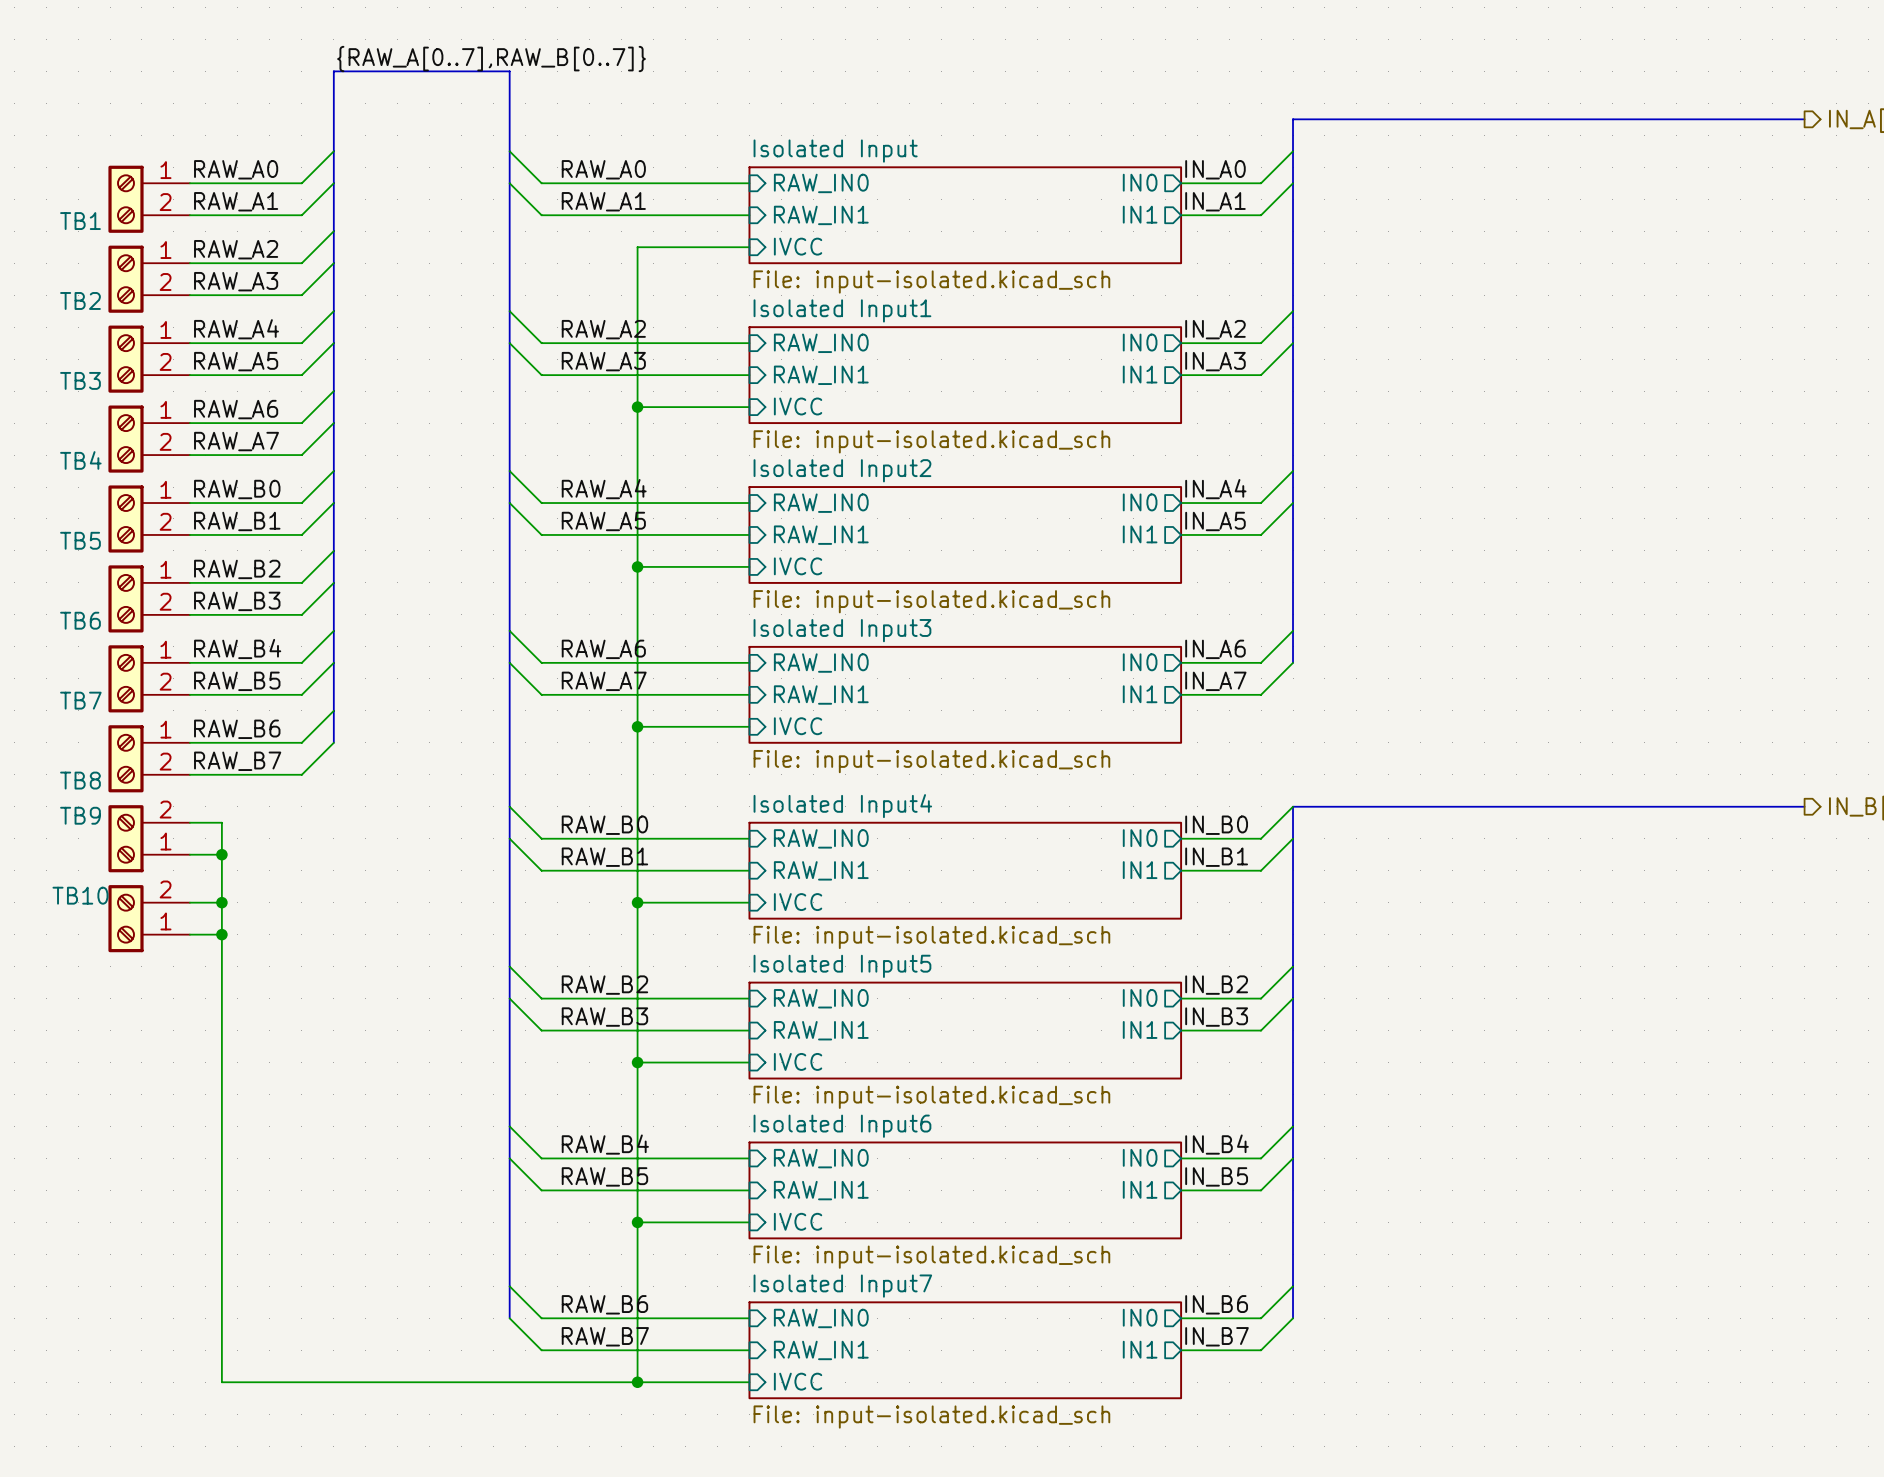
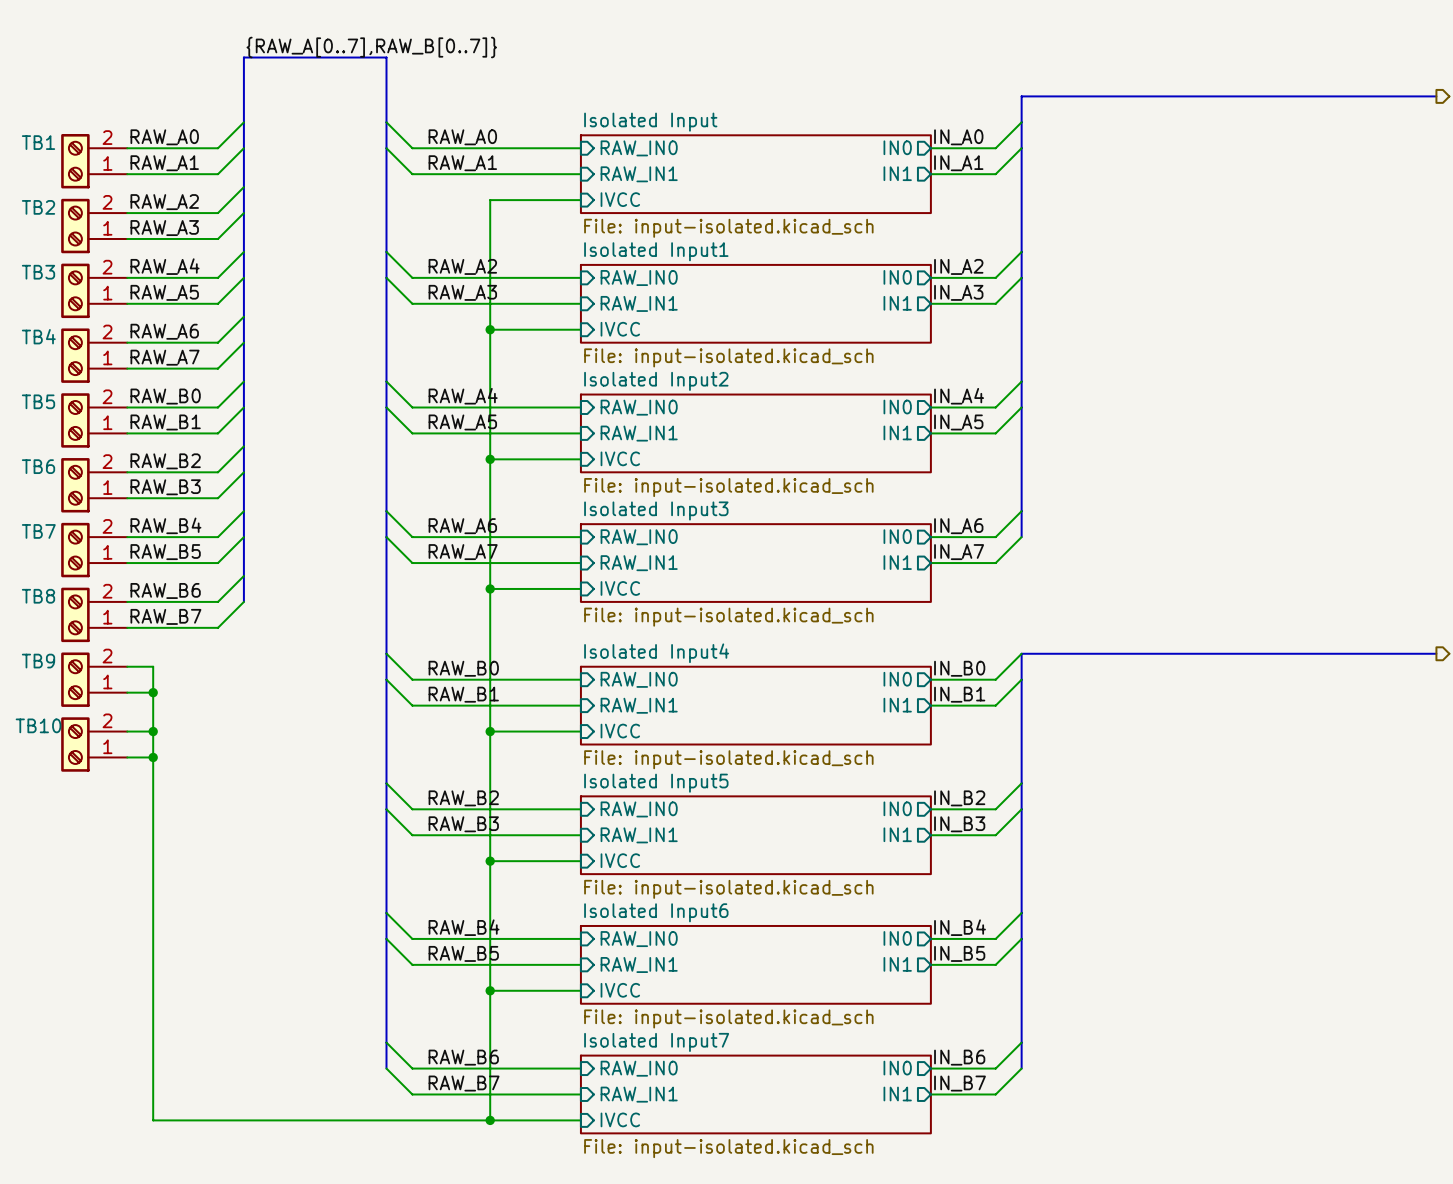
TB1 flip: as is (126, 199) -> up-down (75, 161)
TB2 flip: as is (126, 279) -> up-down (75, 226)
TB3 flip: as is (126, 359) -> up-down (75, 290)
TB4 flip: as is (126, 439) -> up-down (75, 355)
TB5 flip: as is (126, 518) -> up-down (75, 420)
TB6 flip: as is (126, 598) -> up-down (75, 485)
TB7 flip: as is (126, 678) -> up-down (75, 550)
TB8 flip: as is (126, 758) -> up-down (75, 614)

